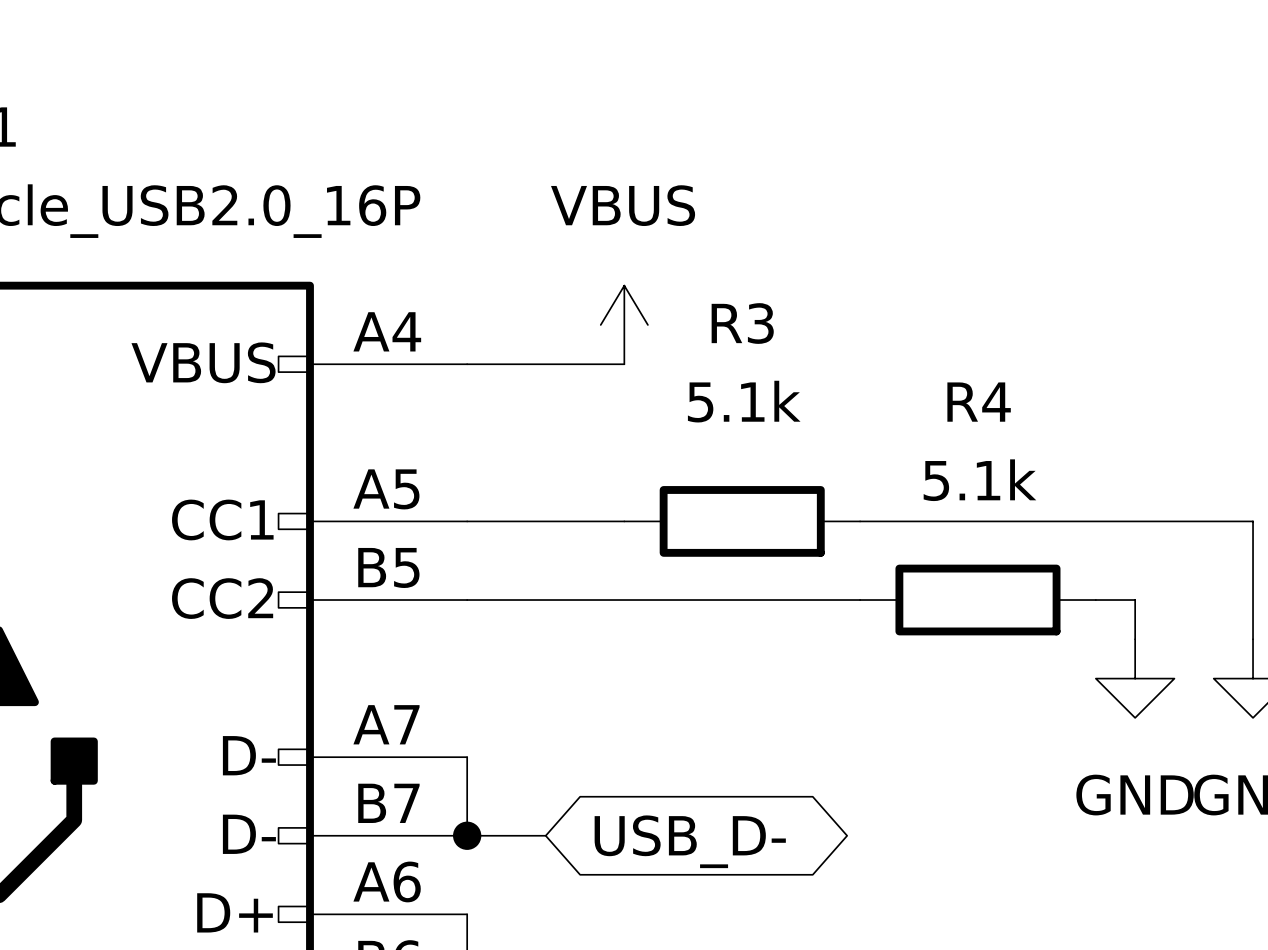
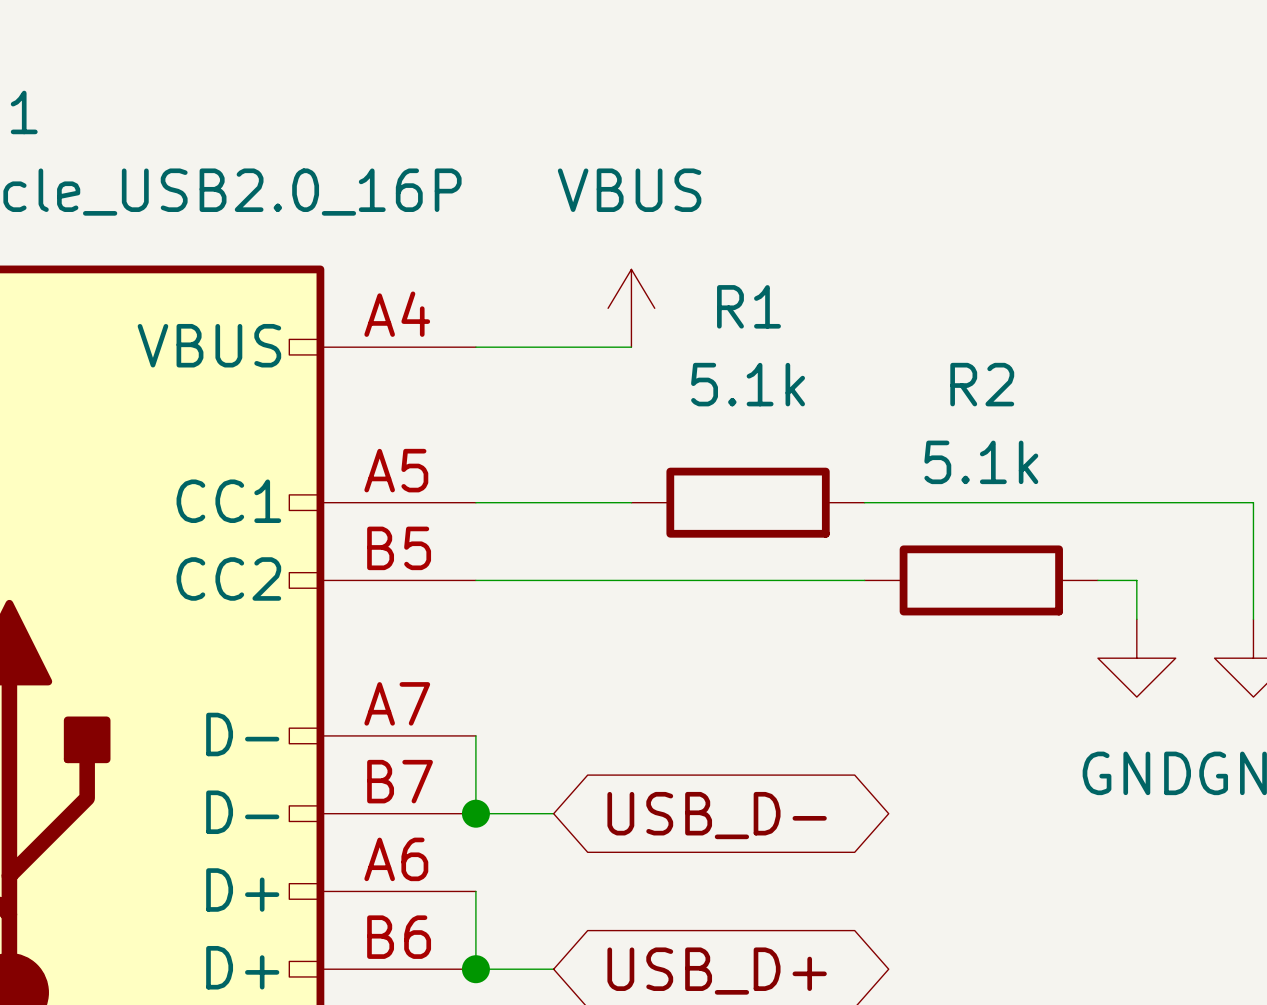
R3 name: R3 (742, 323) -> R1 (748, 306)
R4 name: R4 (979, 402) -> R2 (982, 384)

